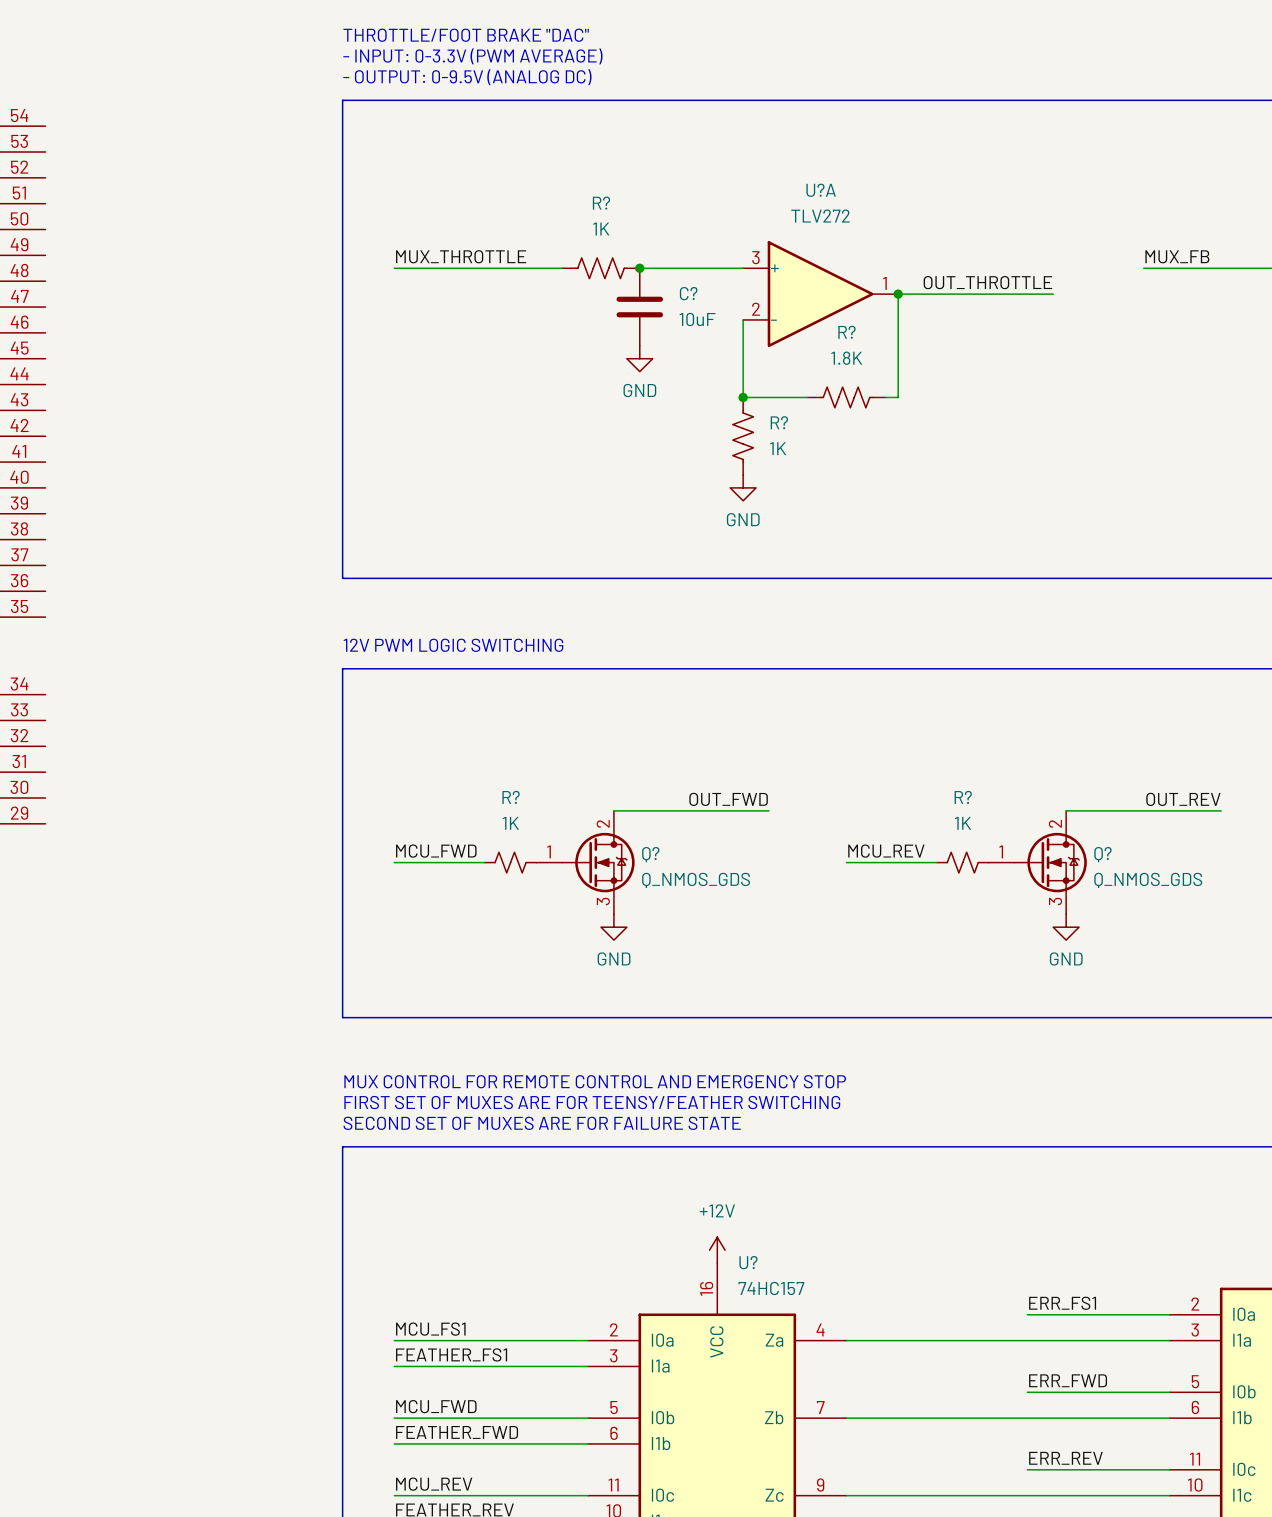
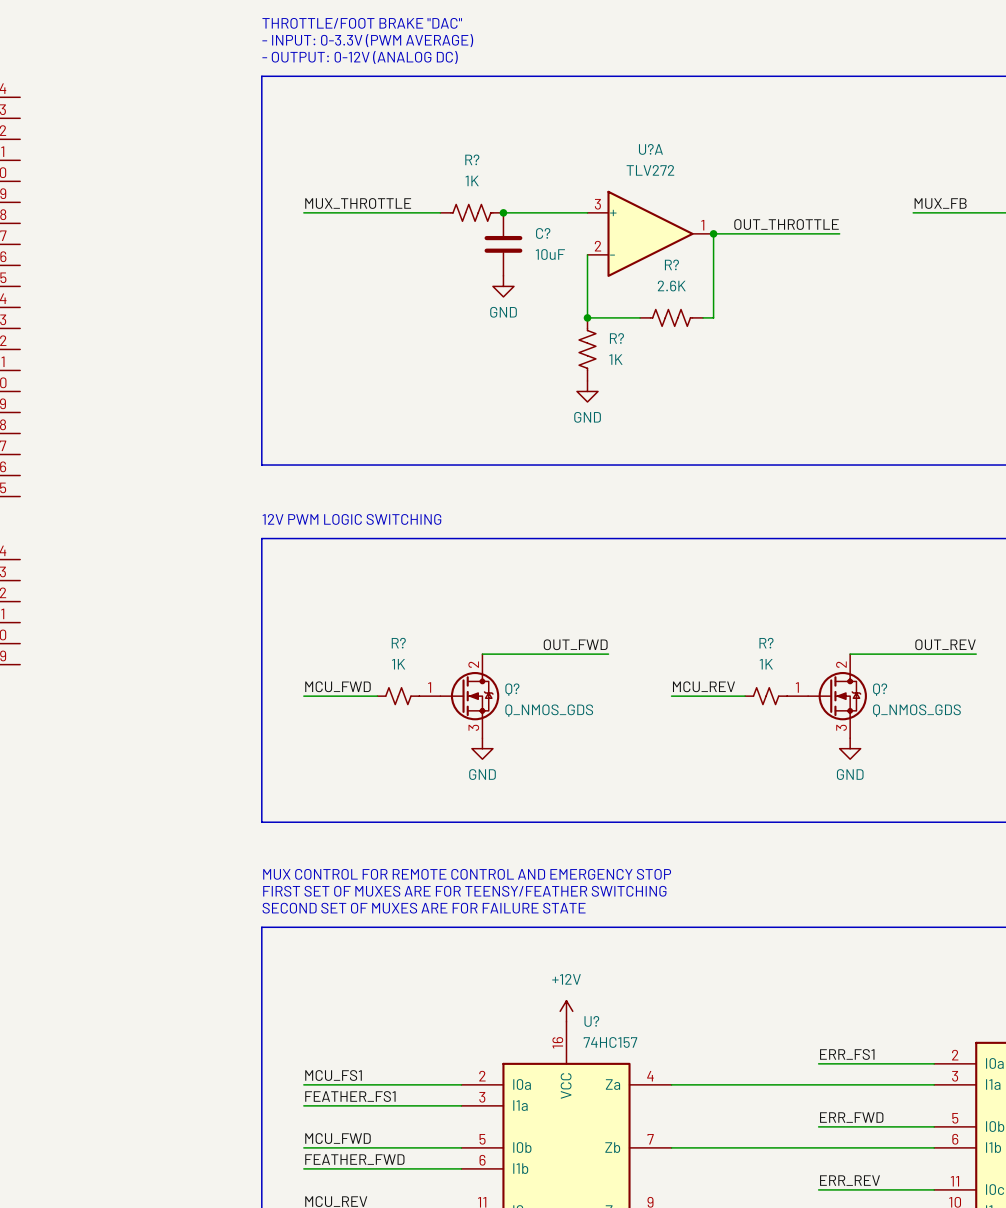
text: - OUTPUT: 0-9.5V (ANALOG DC) (467, 77) -> - OUTPUT: 0-12V (ANALOG DC) (360, 57)
R? value: 1.8K (846, 358) -> 2.6K (671, 286)

